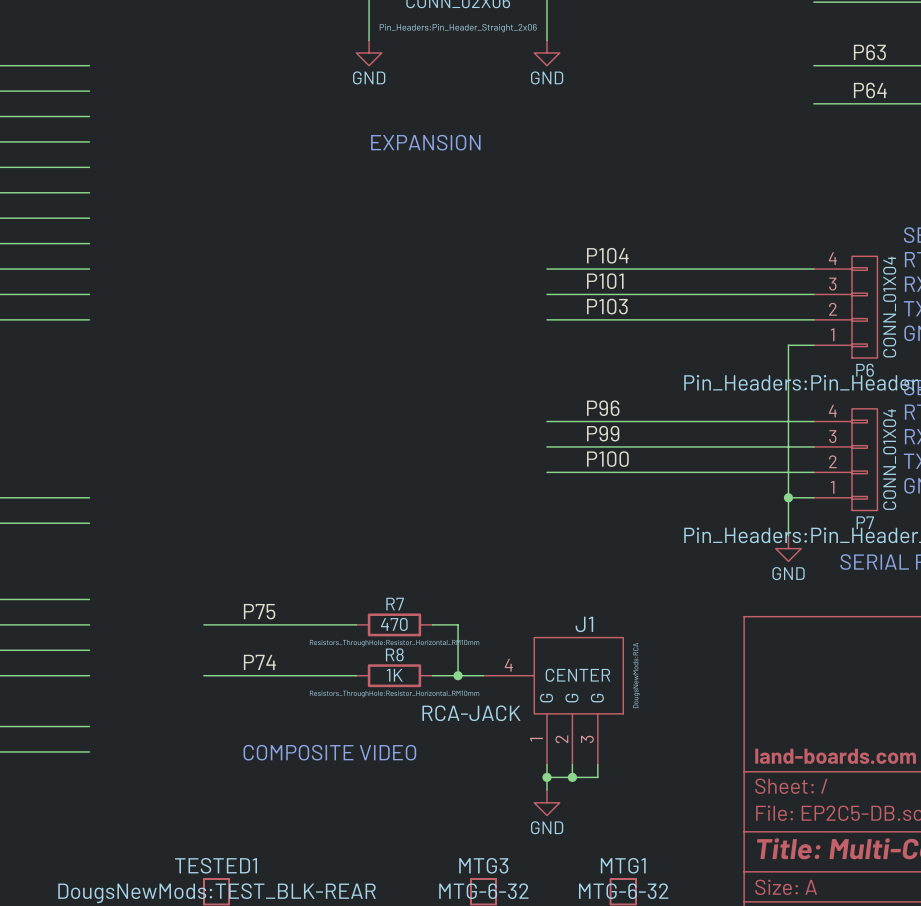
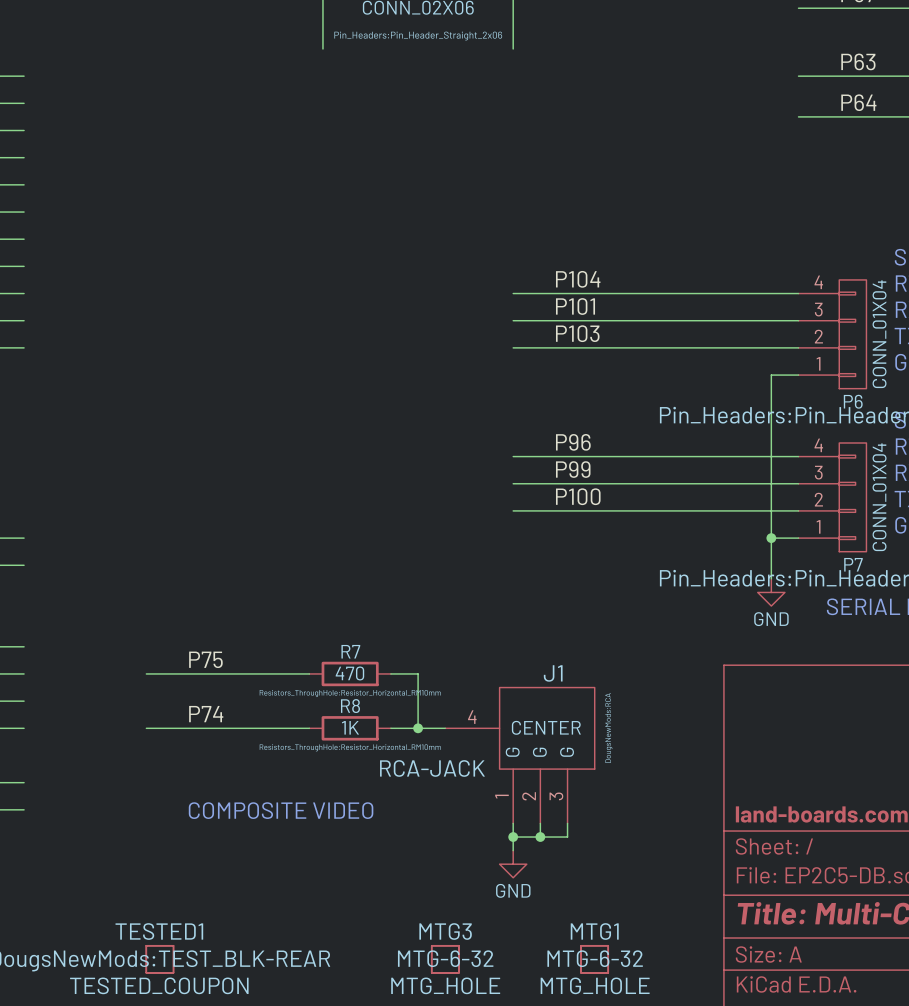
power symbol: GND (369, 52) -> none
power symbol: GND (546, 52) -> none
text: EXPANSION (425, 142) -> none

